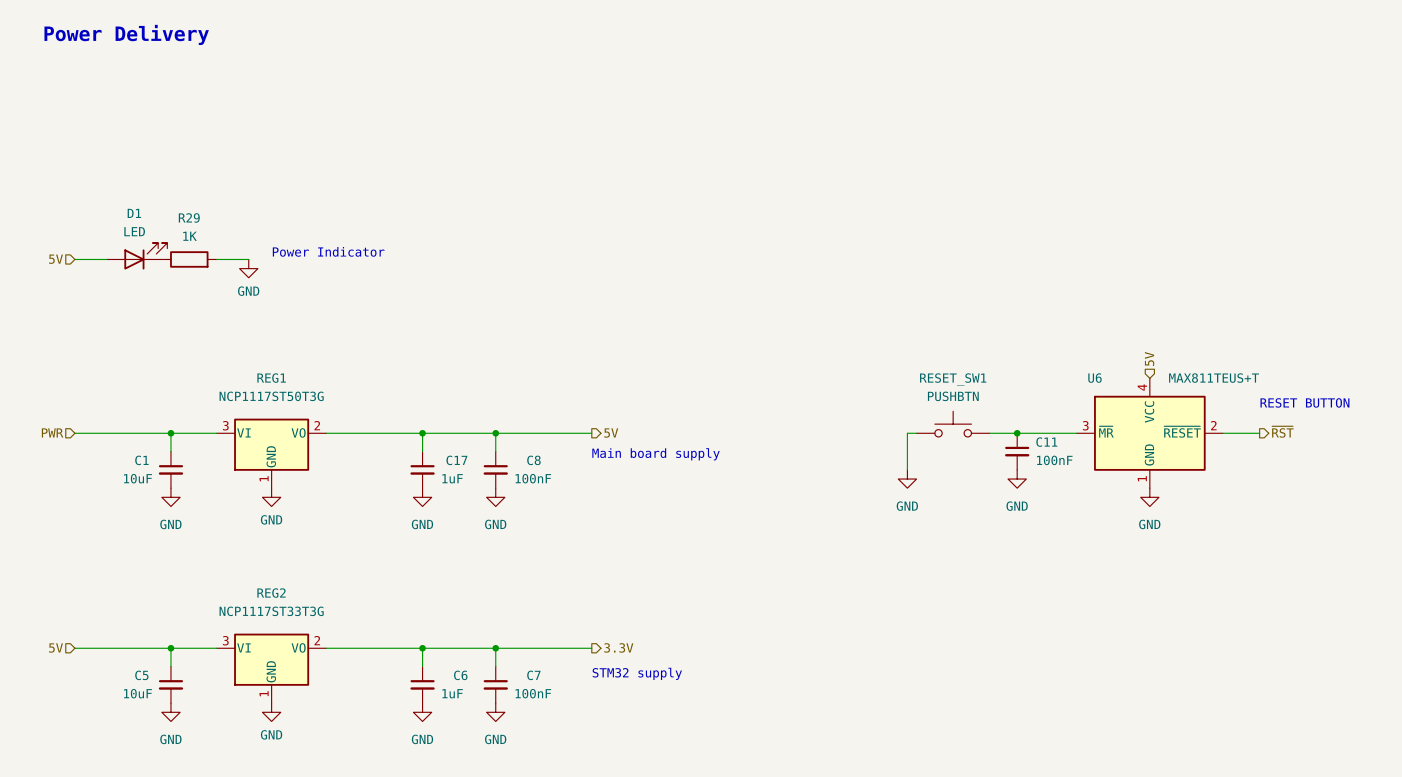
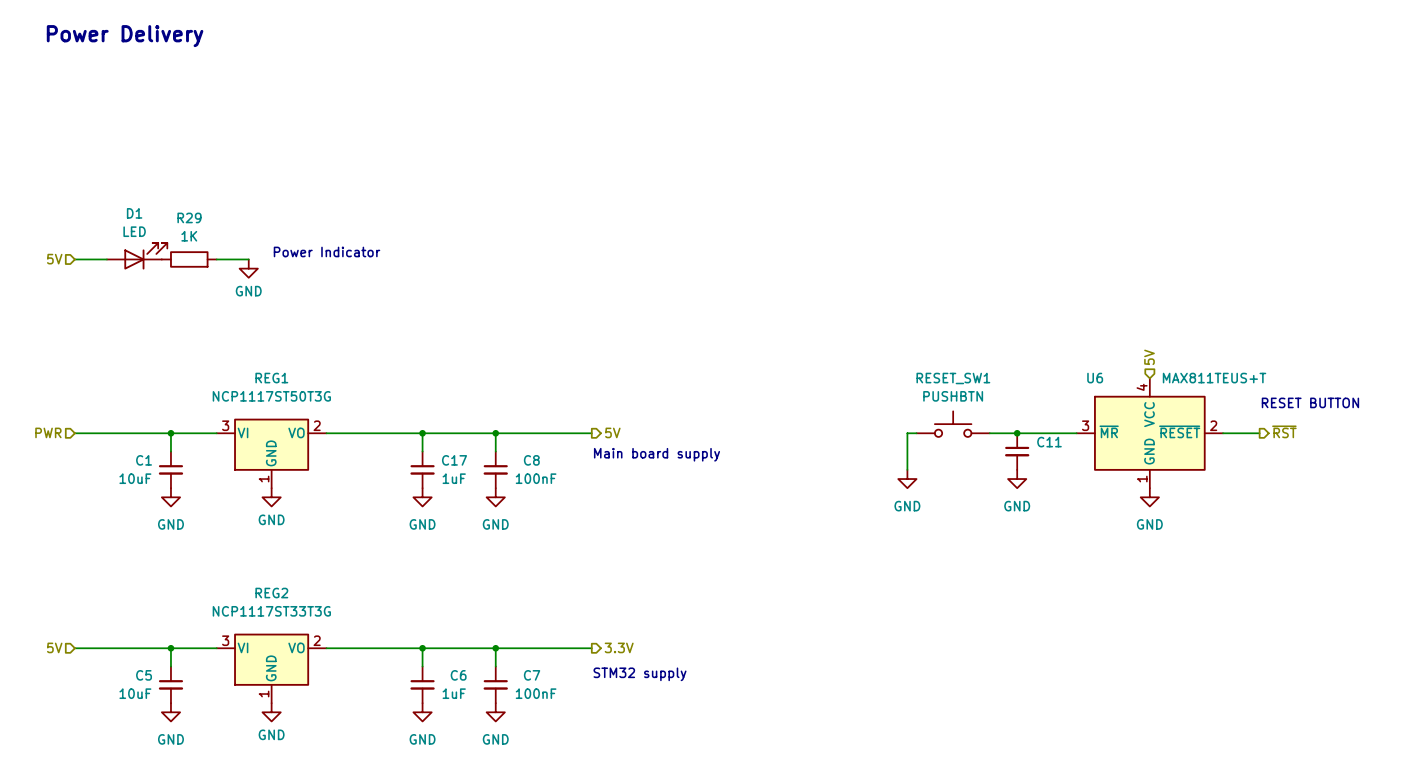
C11 value: 100nF (1054, 460) -> none

